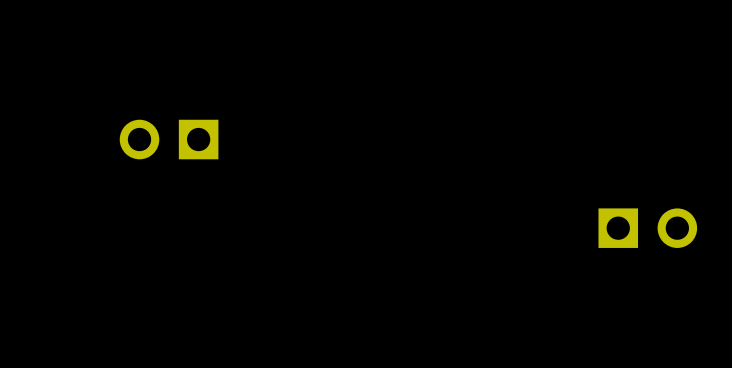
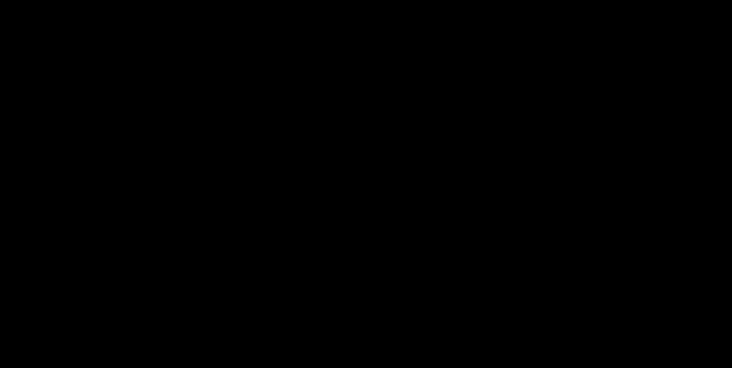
part: (169, 139) -> none
part: (647, 228) -> none

